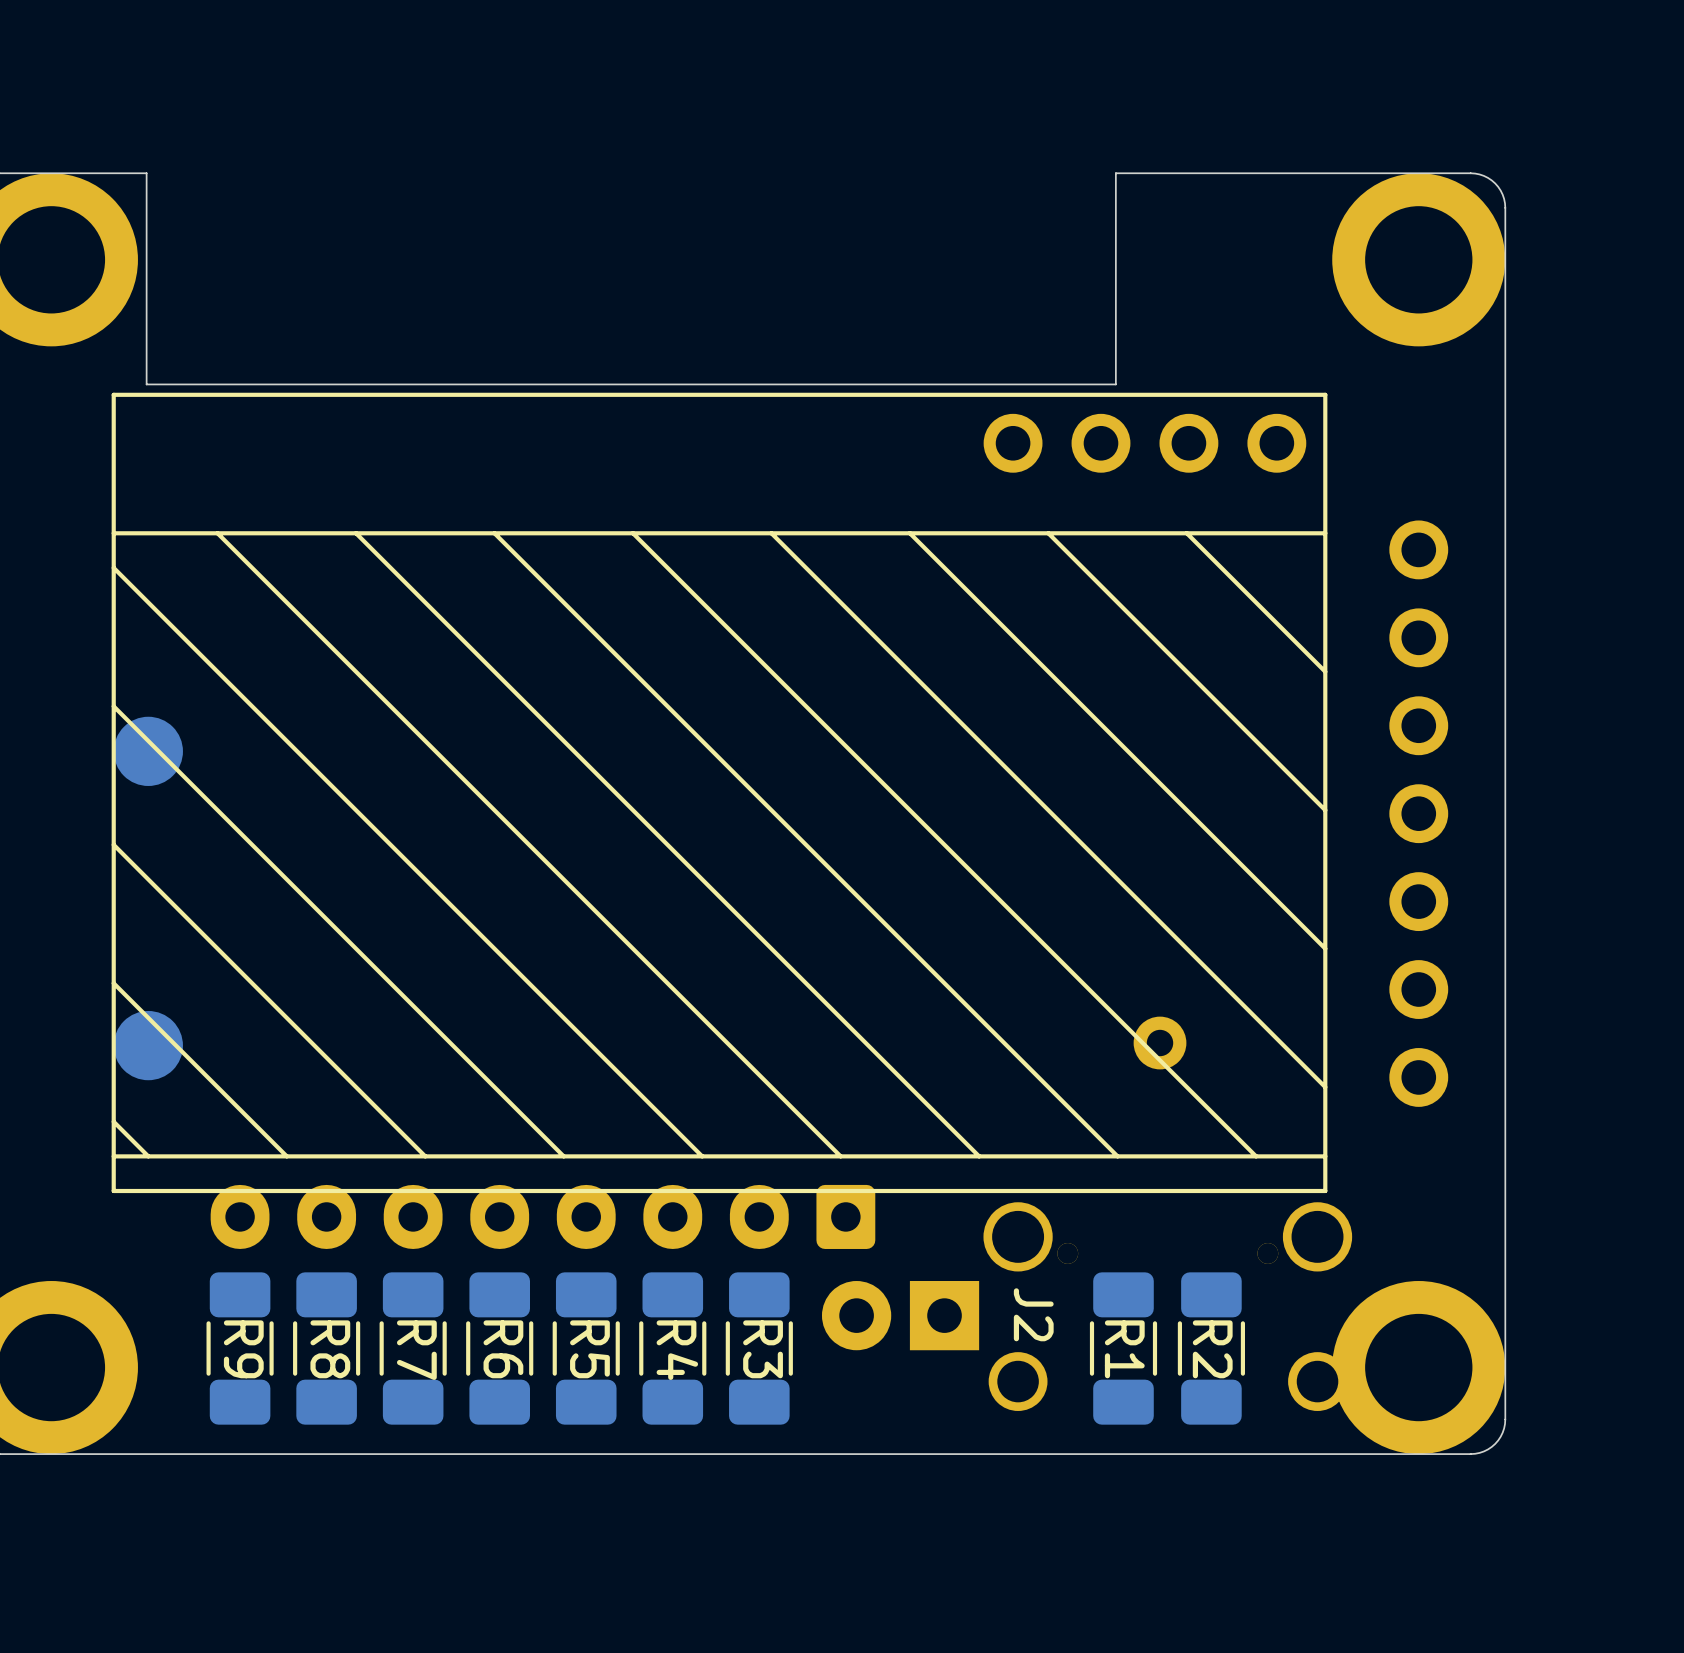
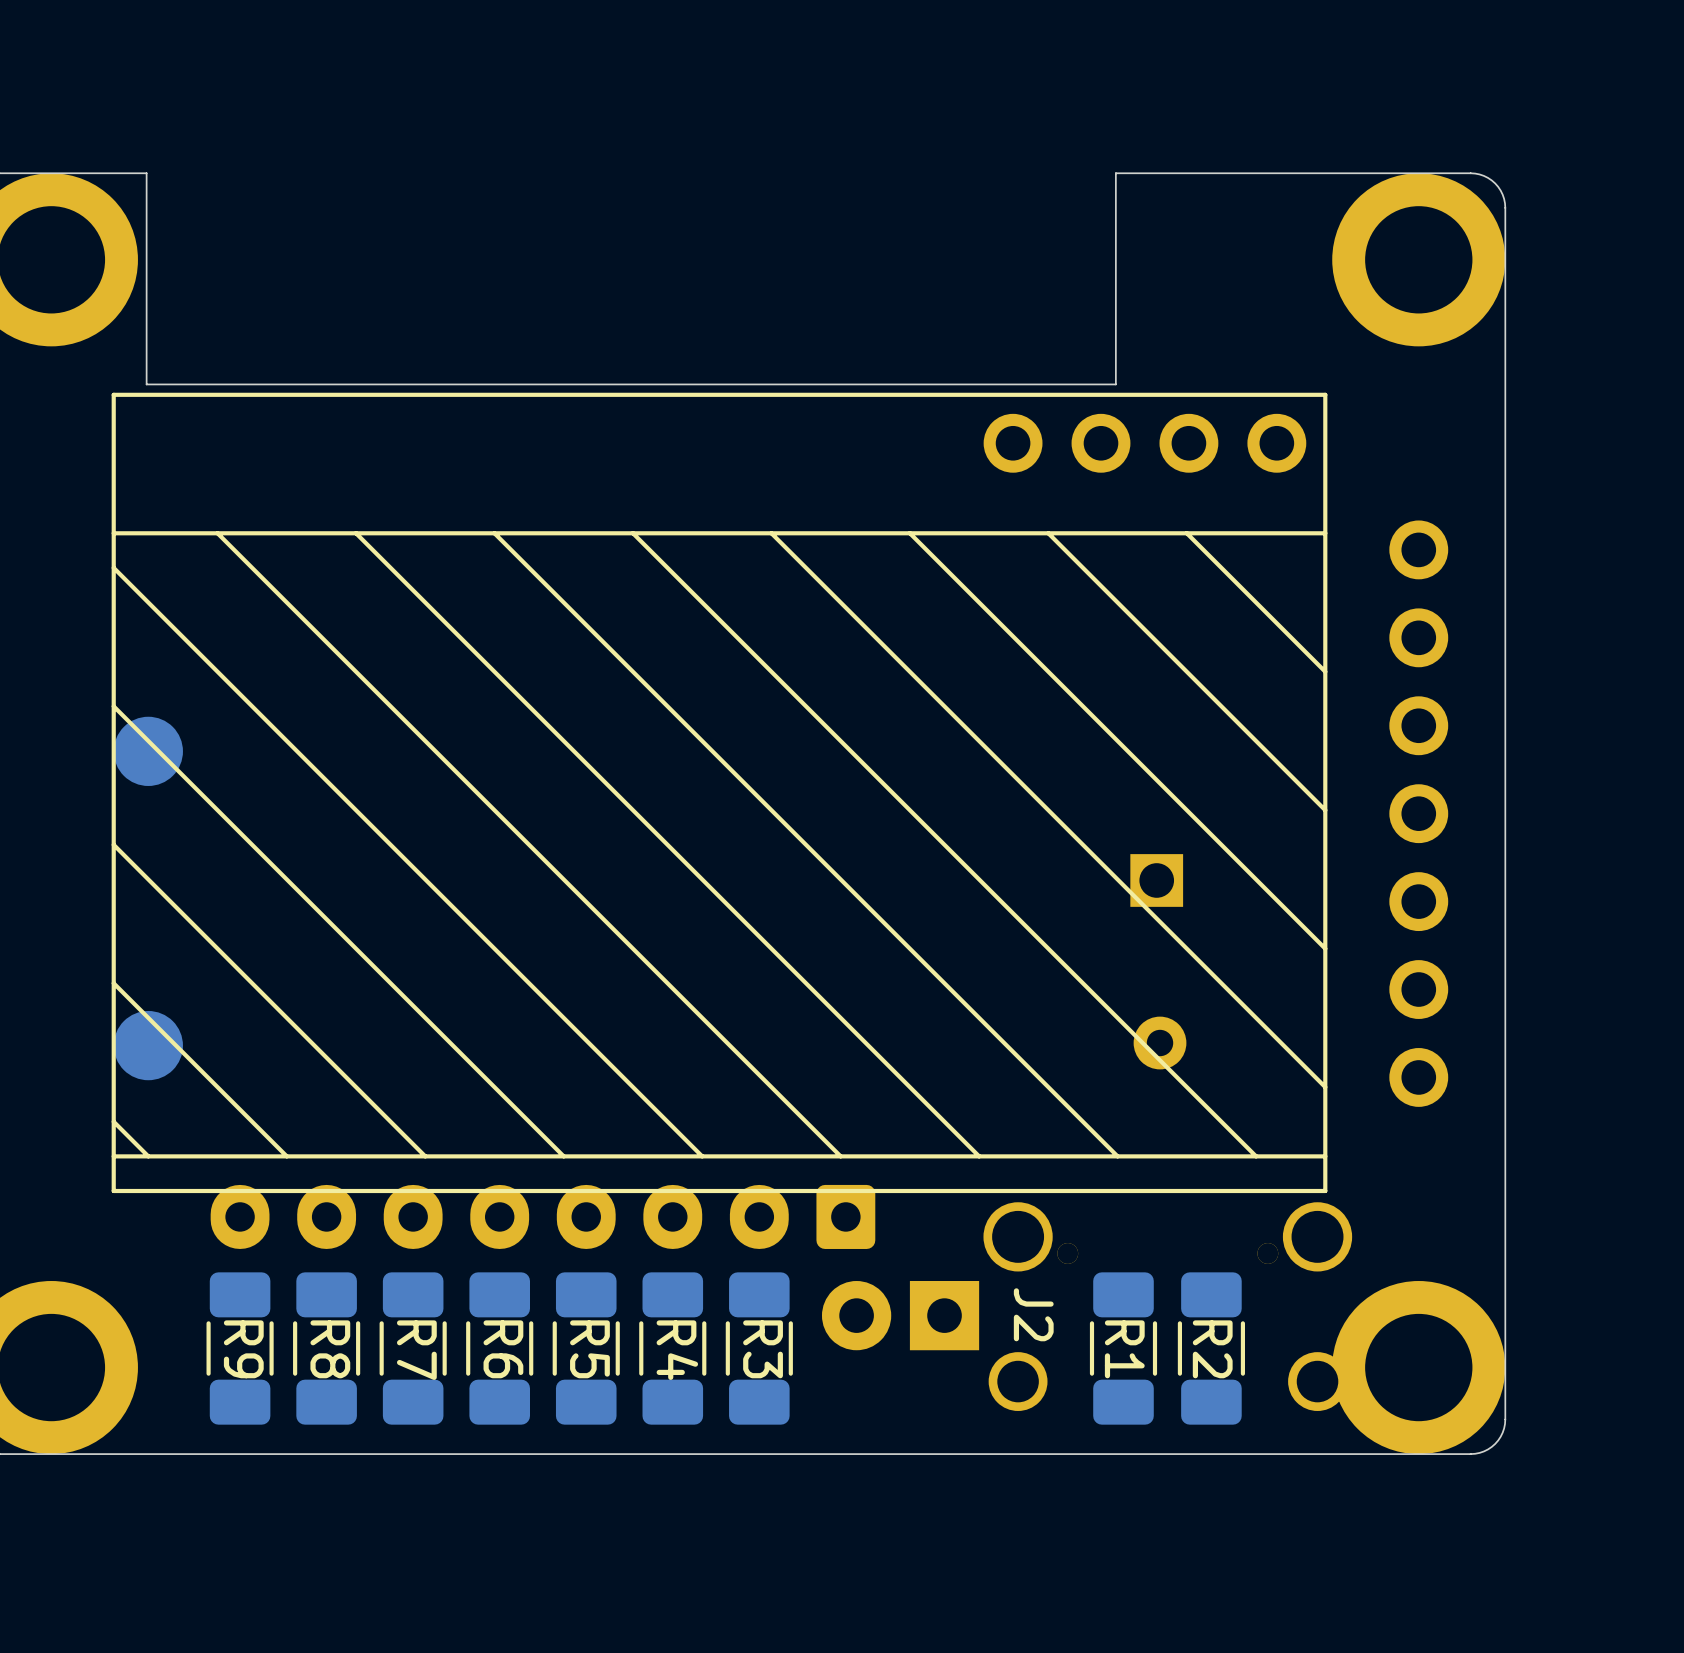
part: none -> (1156, 880)

